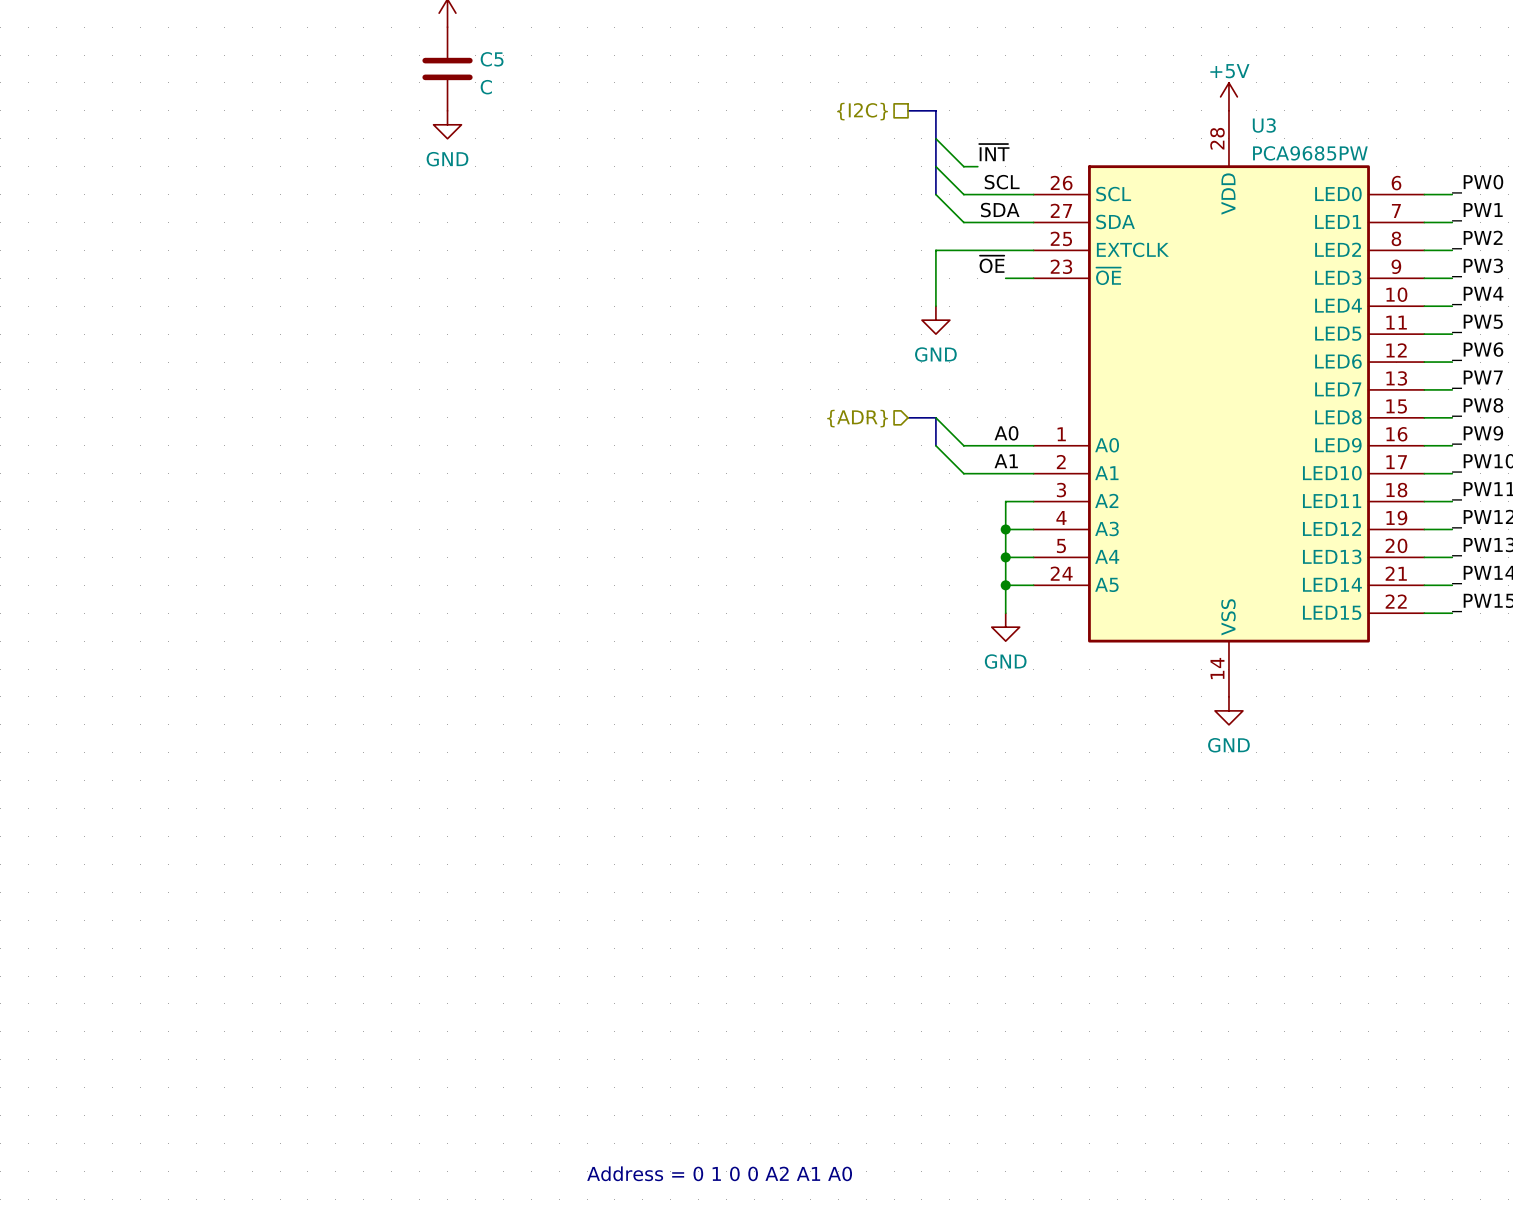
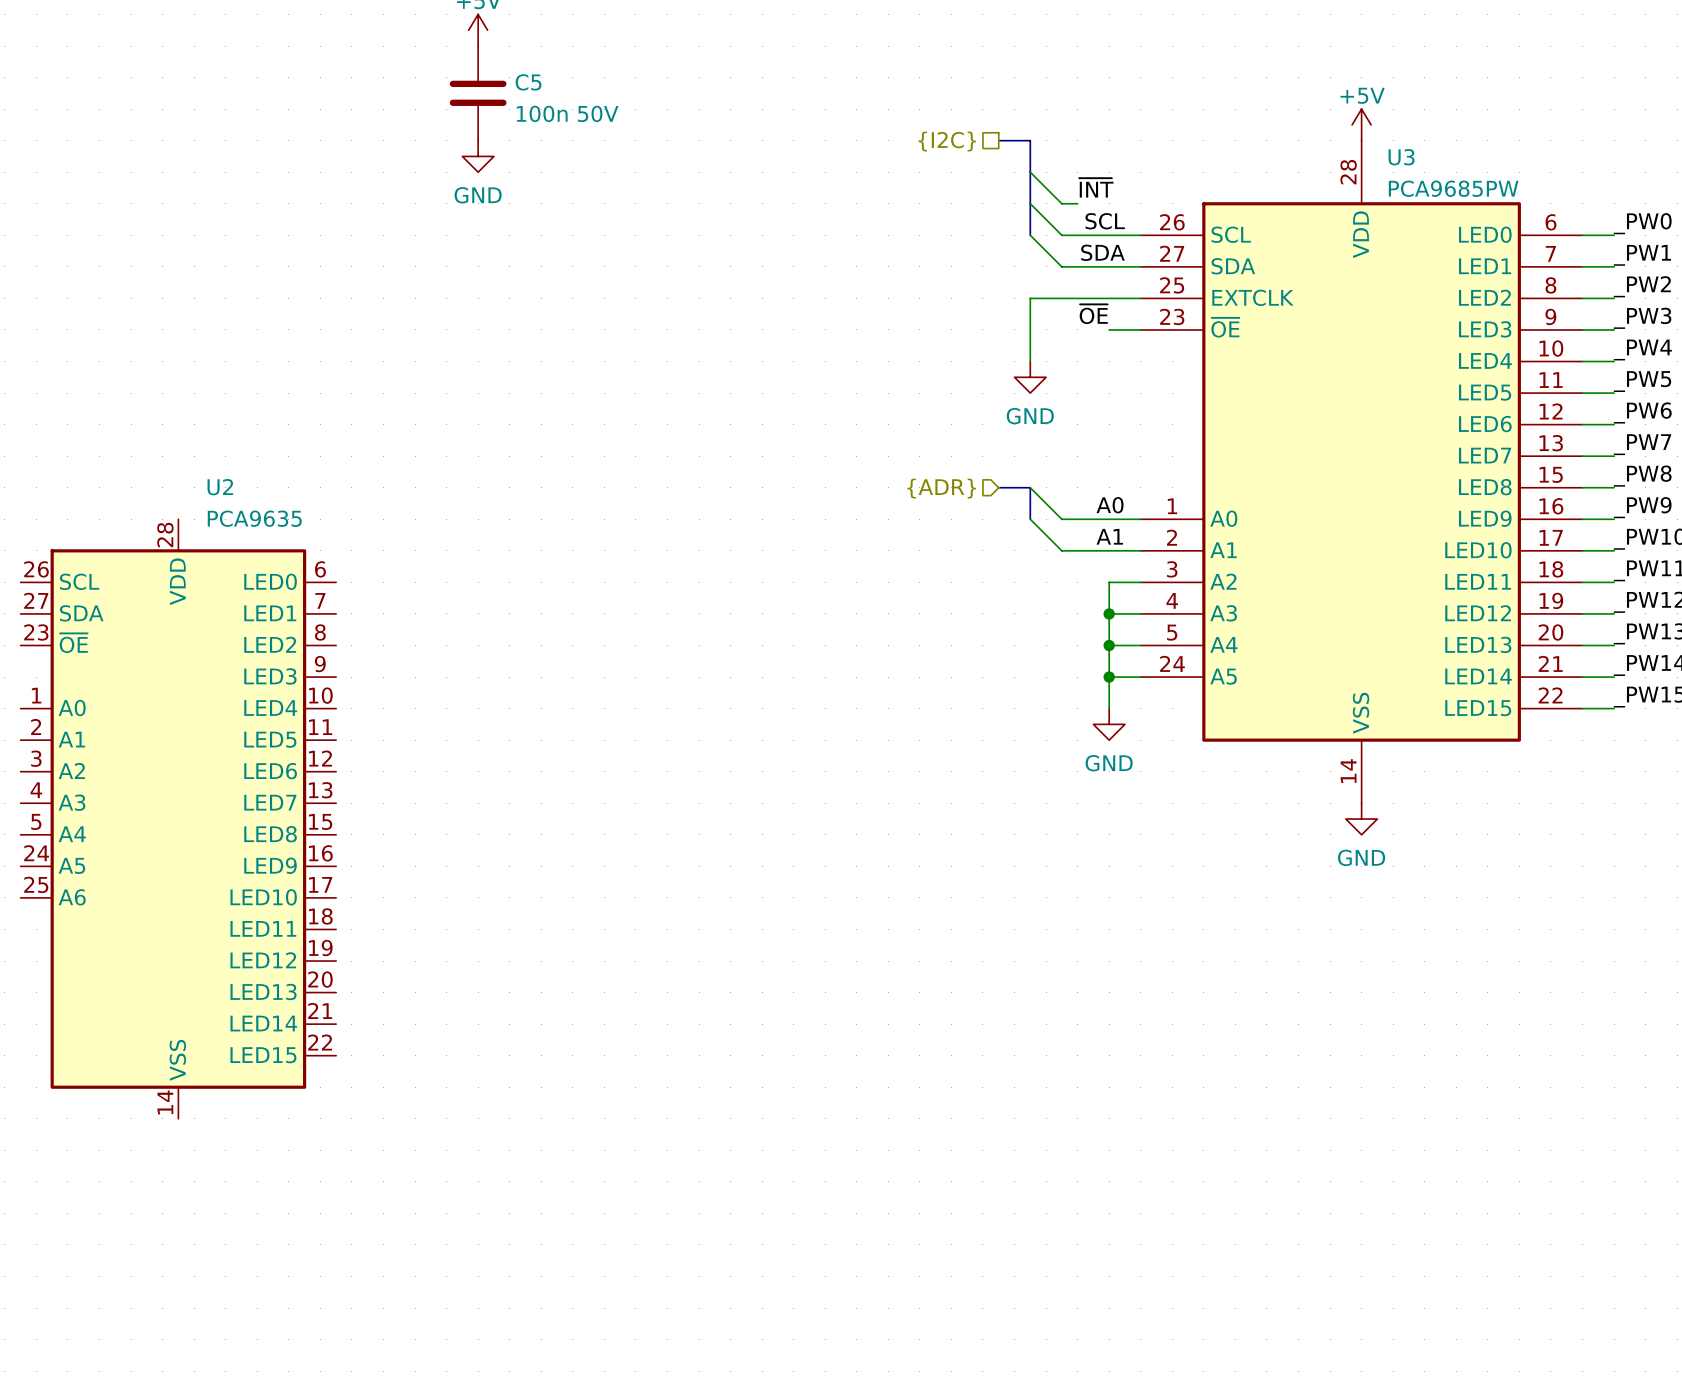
C5 value: C (486, 87) -> 100n 50V (567, 113)
U2: none -> PCA9635 (178, 819)
text: Address = 0 1 0 0 A2 A1 A0 (719, 1173) -> none

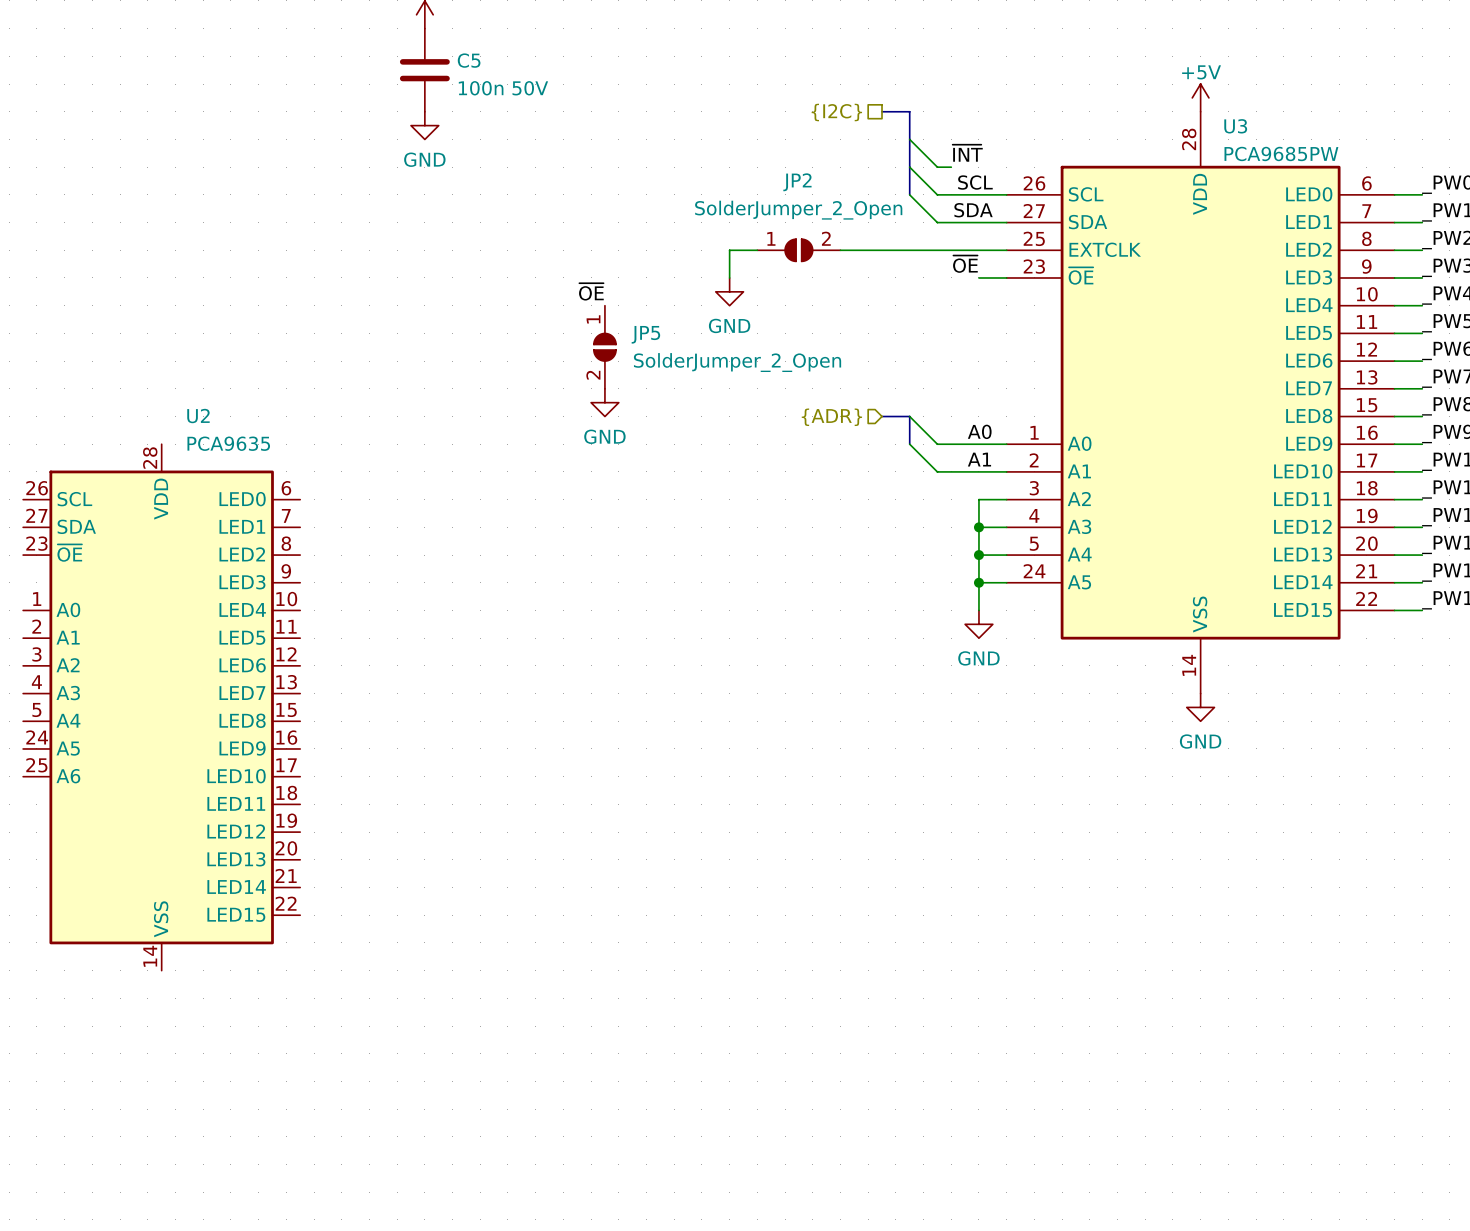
wire: none -> (757, 250) (729, 250) (729, 277)
JP2: none -> SolderJumper_2_Open (798, 250)
wire: (1030, 298) (1030, 361) -> (909, 250) (840, 250)
label: none -> ~{OE} (591, 291)
power symbol: none -> GND (729, 291)
power symbol: GND (1030, 377) -> none
JP5: none -> SolderJumper_2_Open (604, 347)
power symbol: none -> GND (604, 402)

